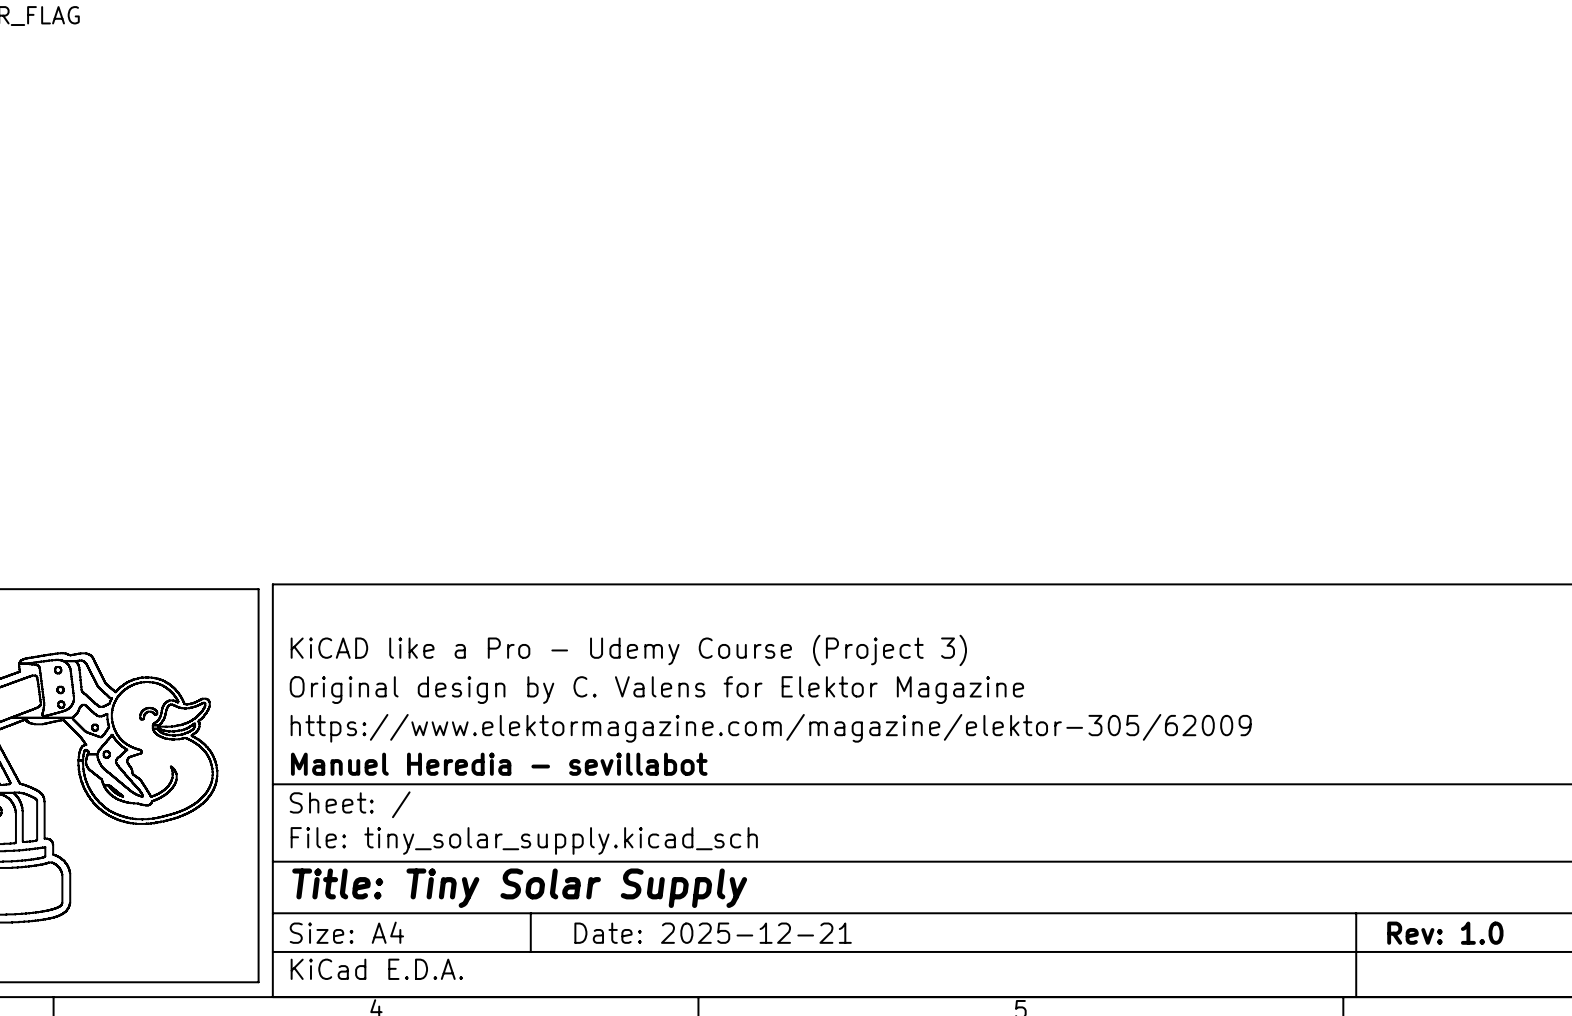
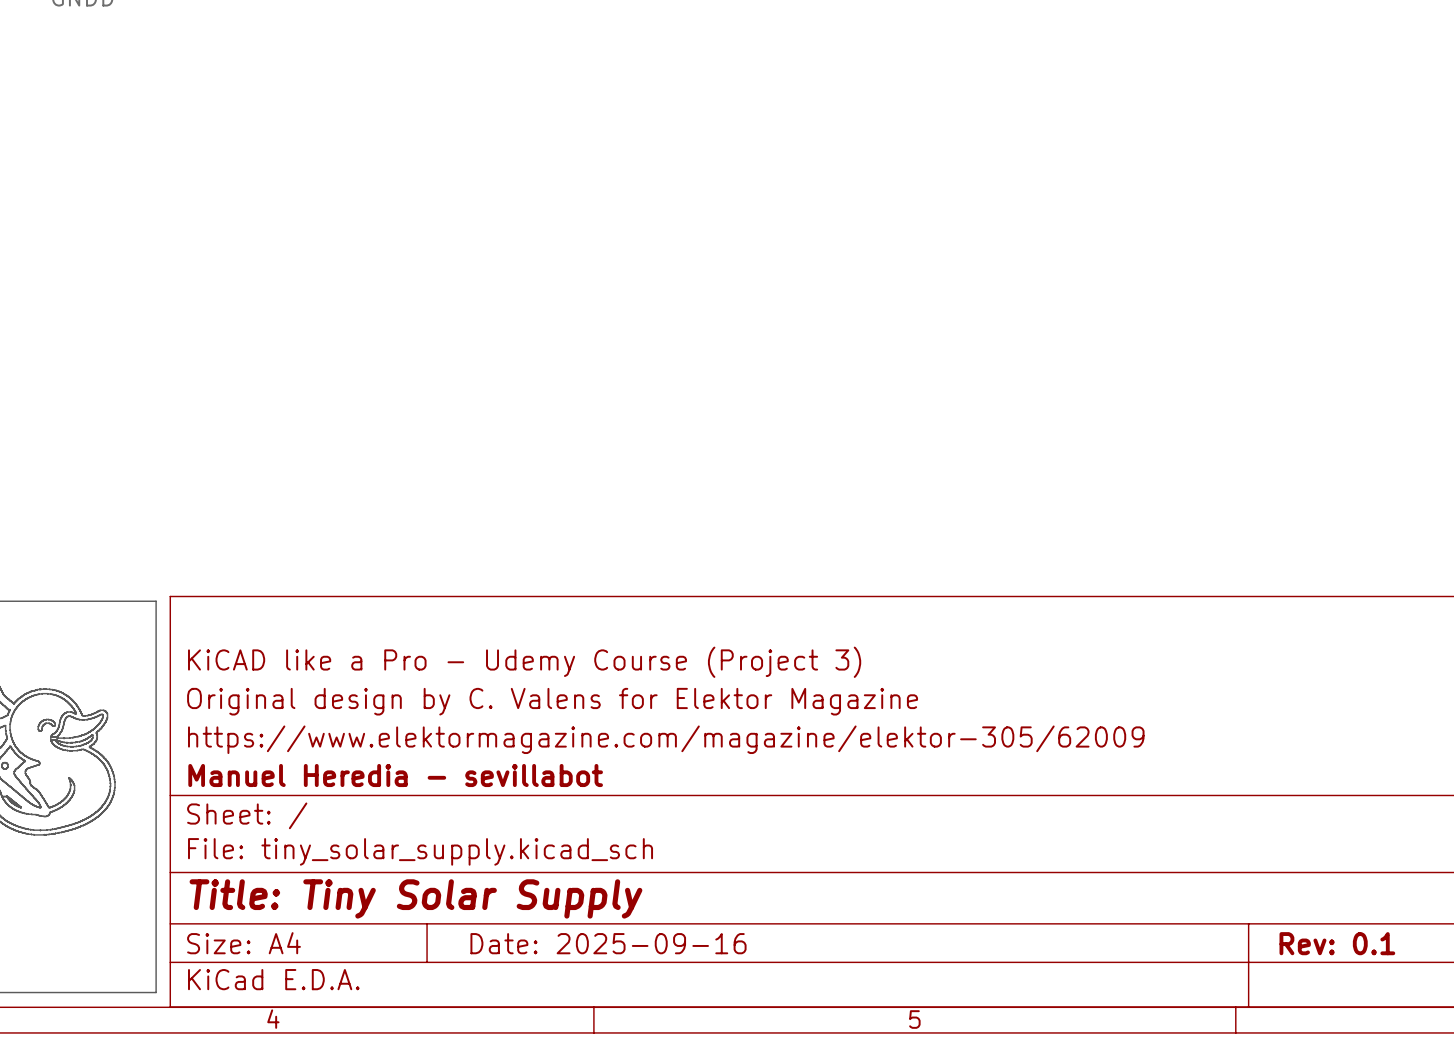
title block: Date: 2025-12-21 (713, 933) -> Date: 2025-09-16 (608, 943)
title block: Rev: 1.0 (1445, 933) -> Rev: 0.1 (1337, 943)

